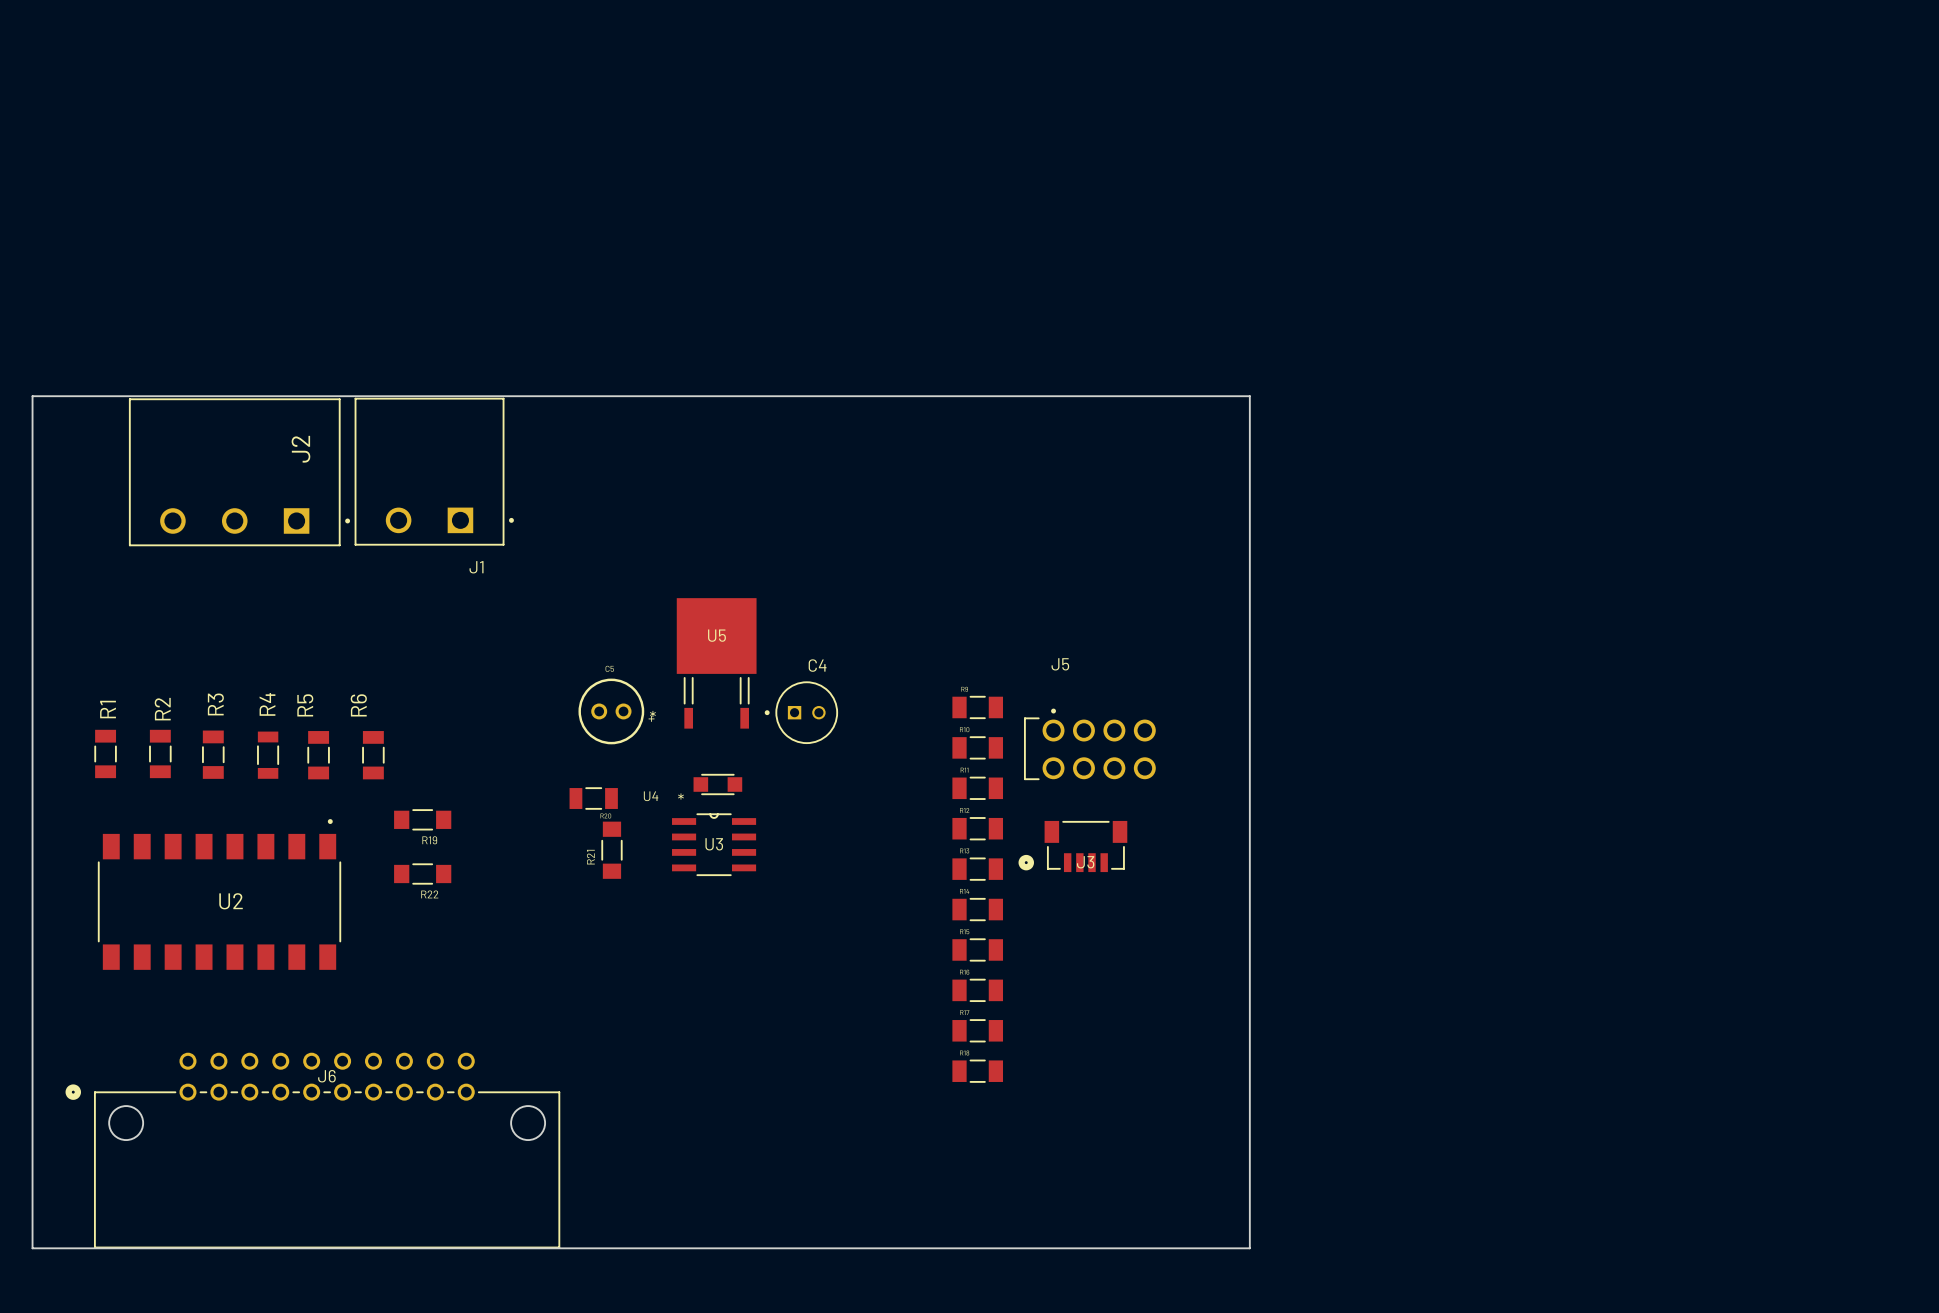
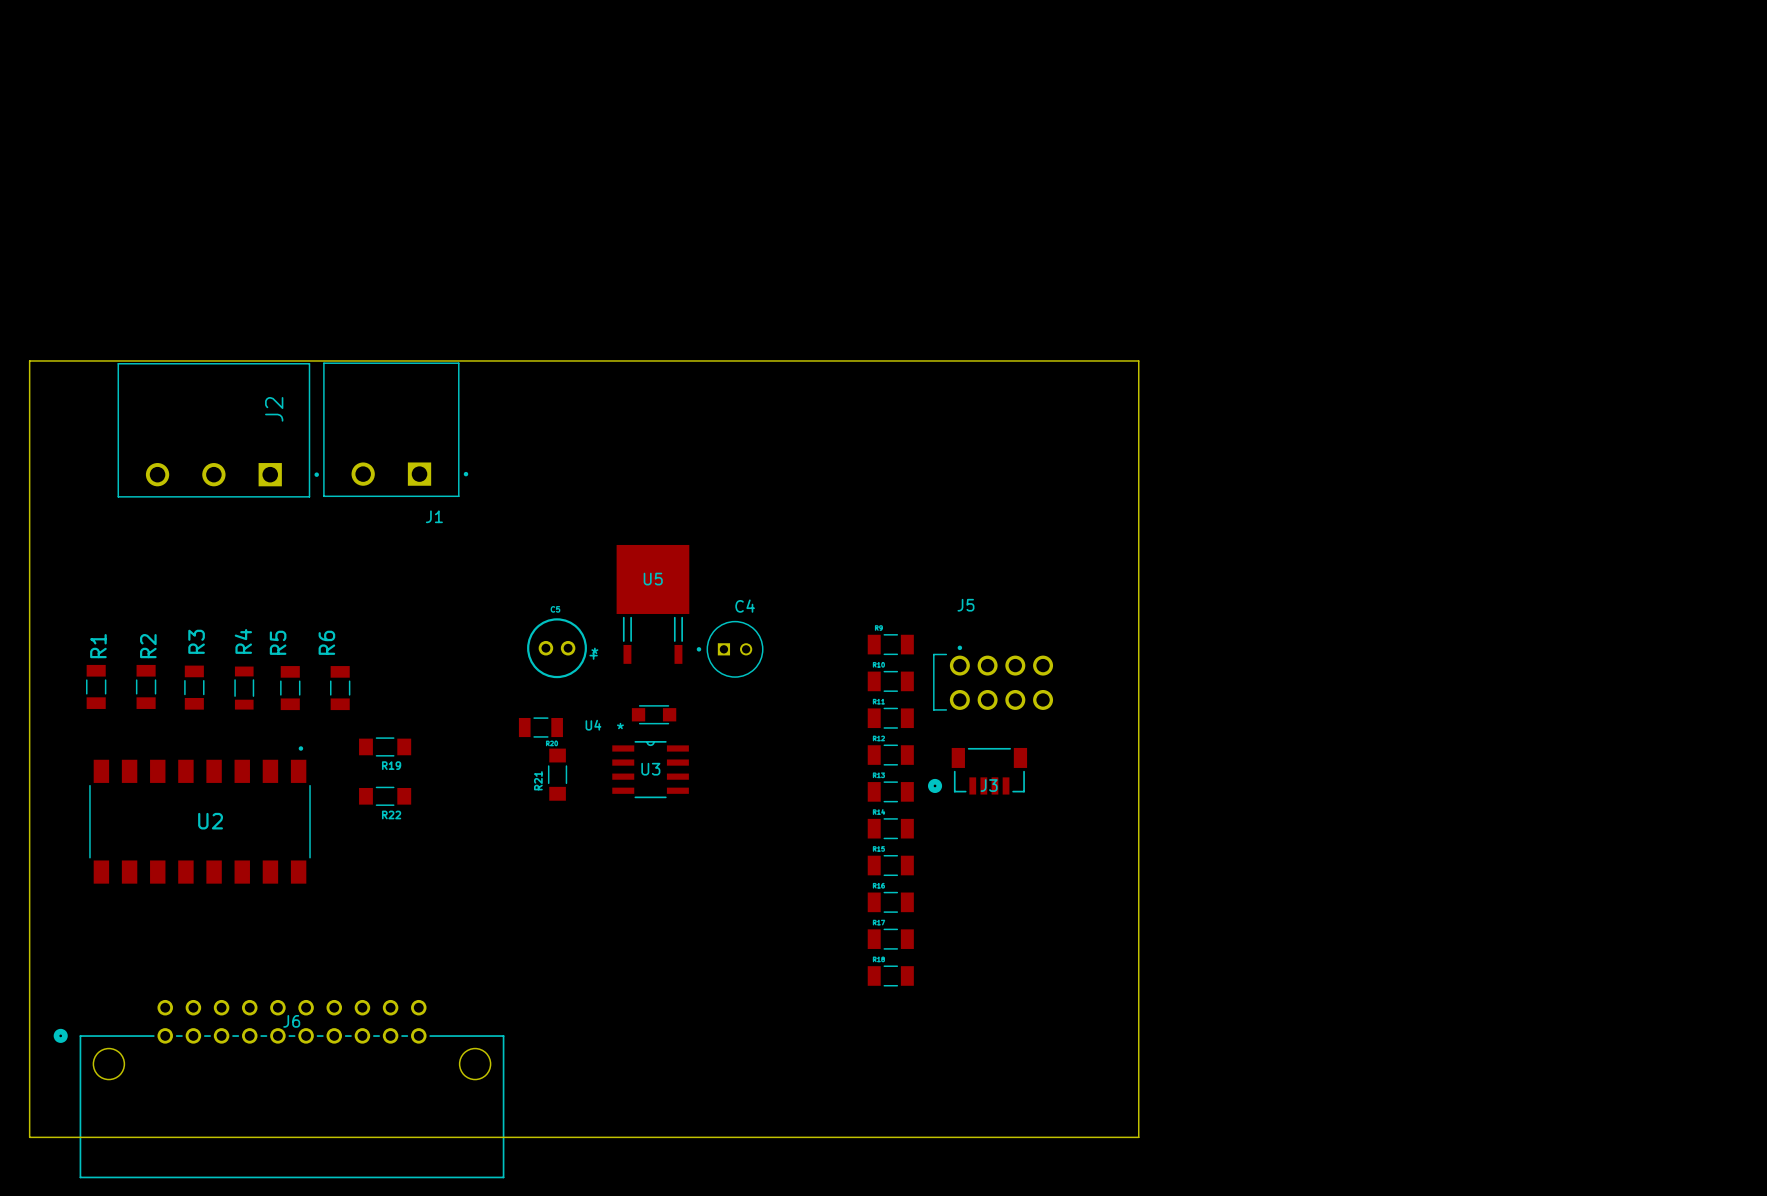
J6 position: (312, 1150) -> (279, 1089)

